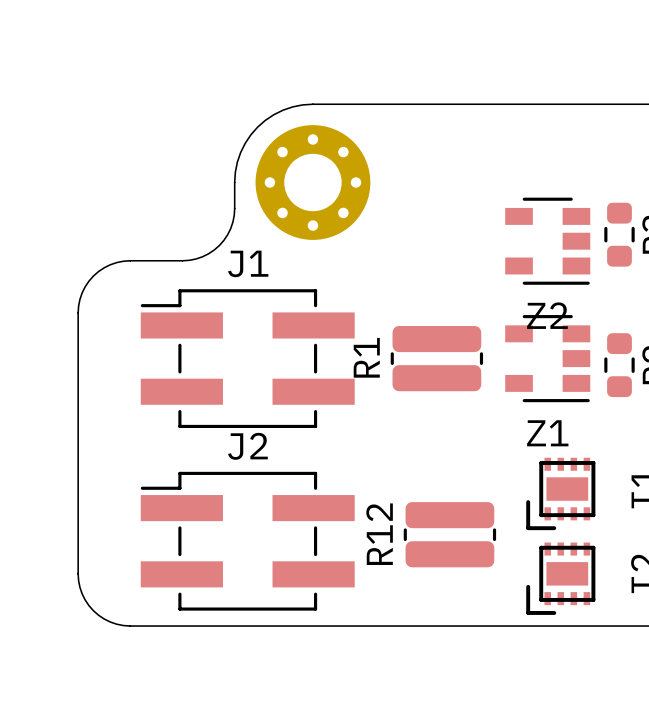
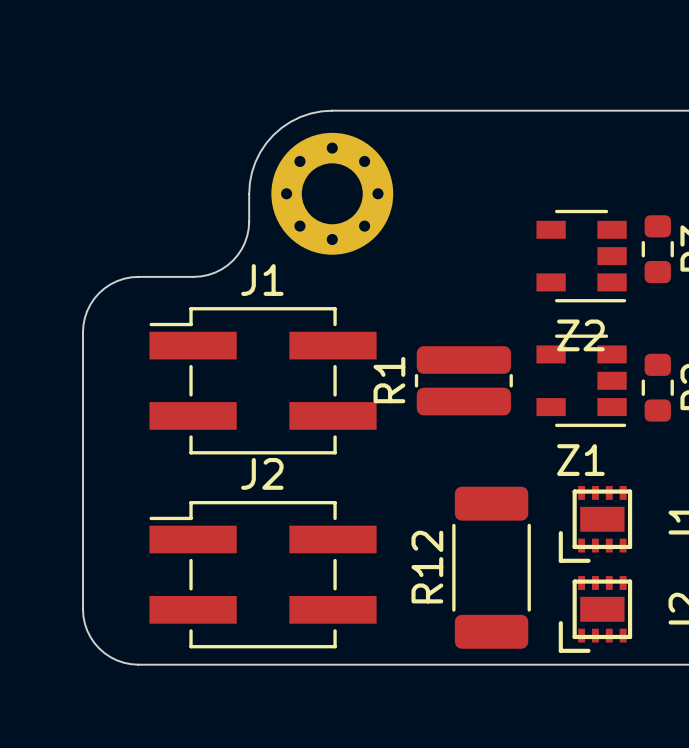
R12 footprint: [403, 502, 497, 568] -> [452, 486, 531, 649]

